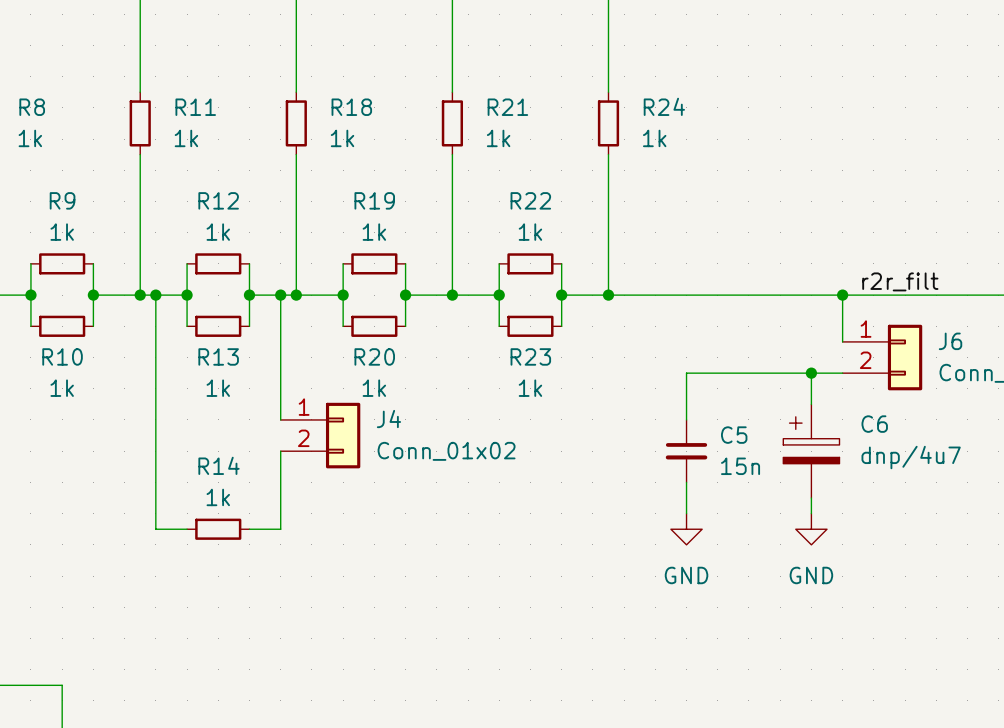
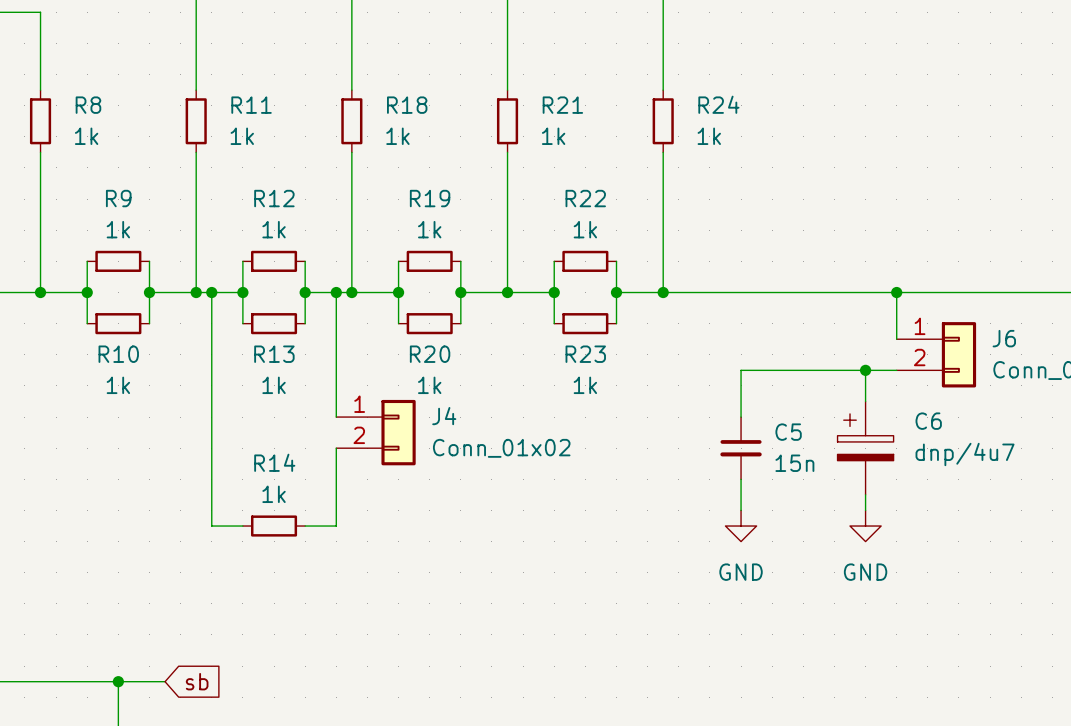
label: r2r_filt (900, 281) -> none
wire: none -> (118, 681) (165, 681)
junction: none -> (118, 681)
global label: none -> sb (197, 681)

